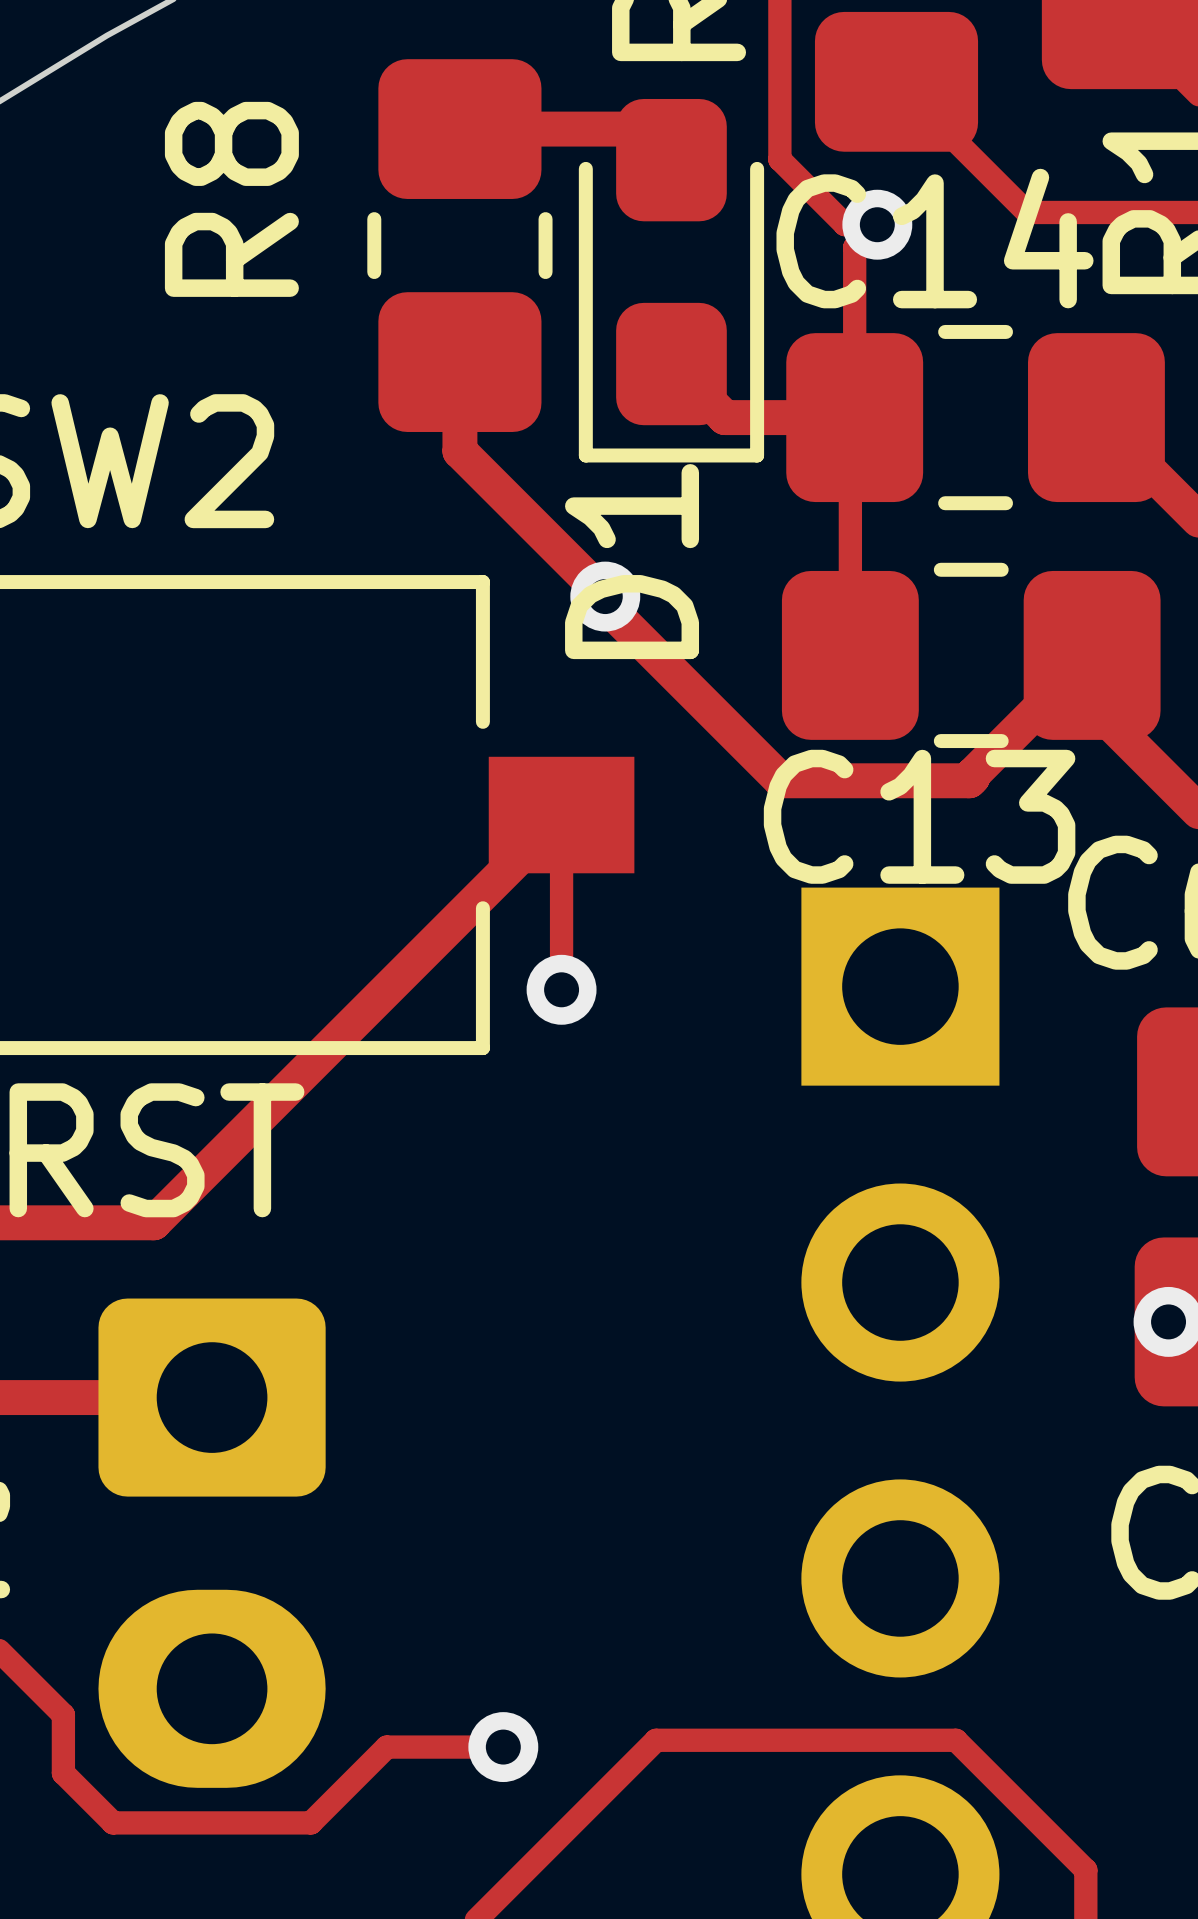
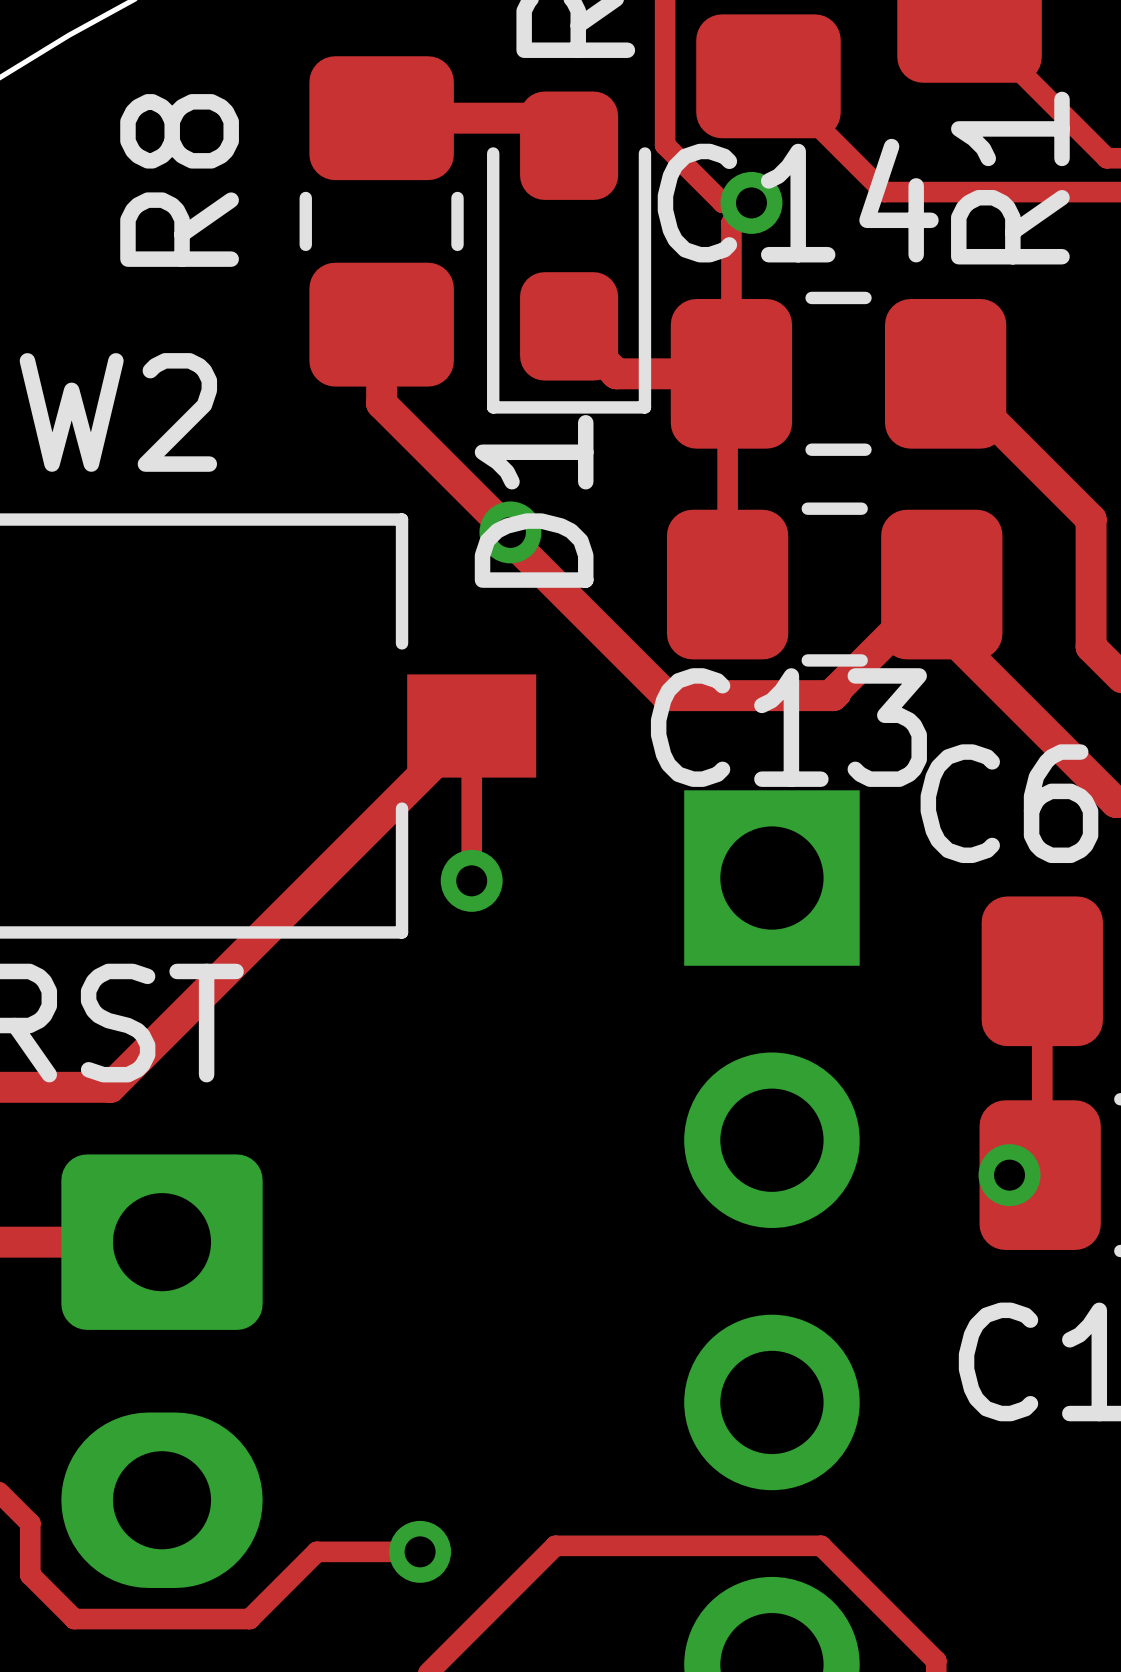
C14 name position: C14 (935, 238) -> C14 (798, 200)

